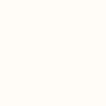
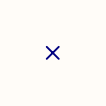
no-connect mark: none -> (52, 52)

